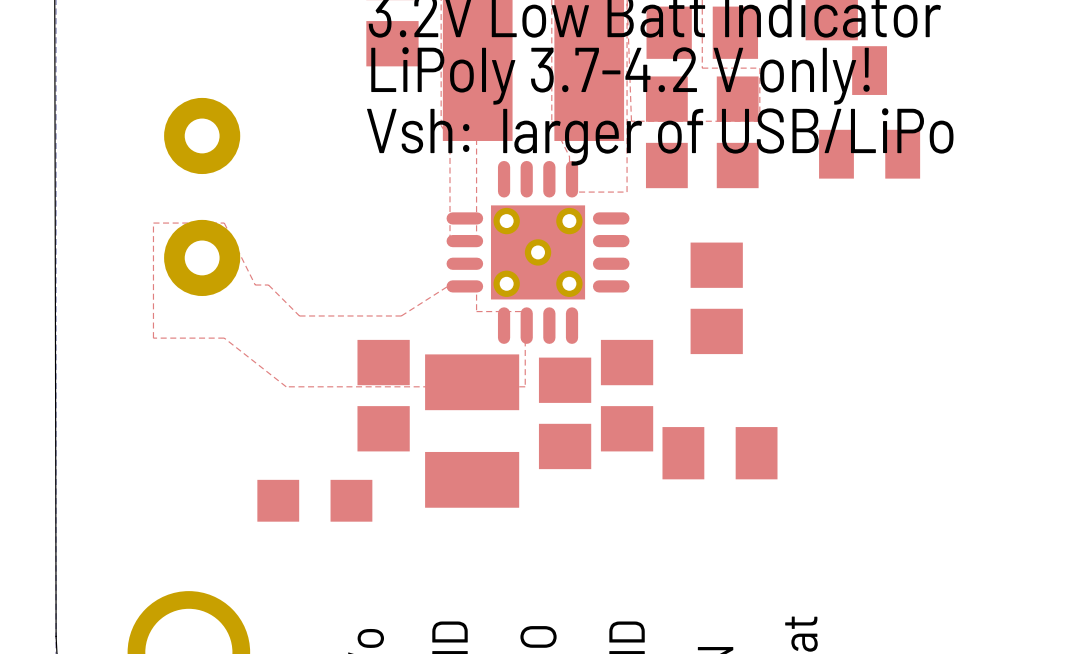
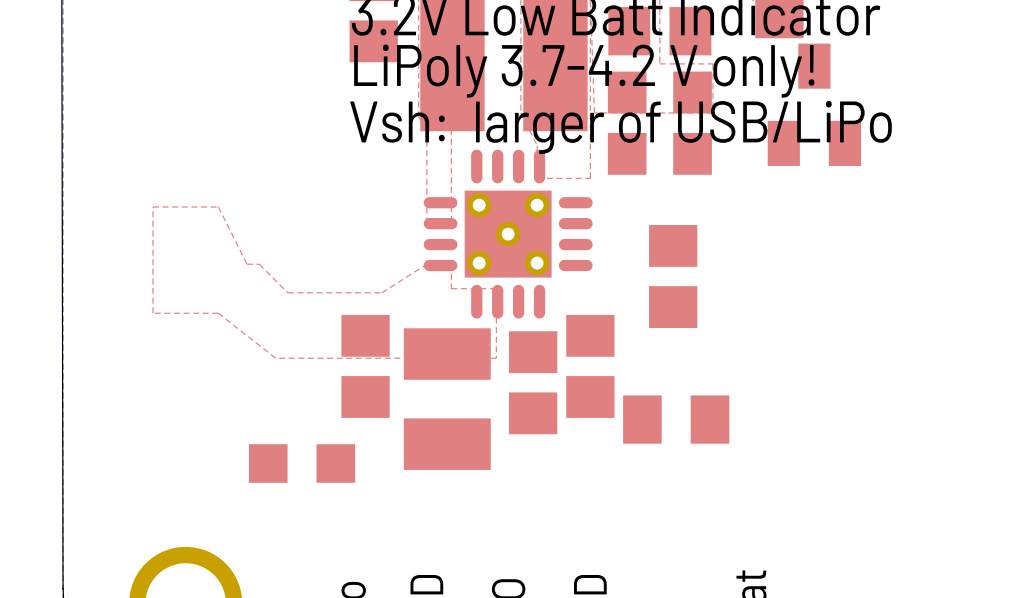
part: (202, 196) -> none

